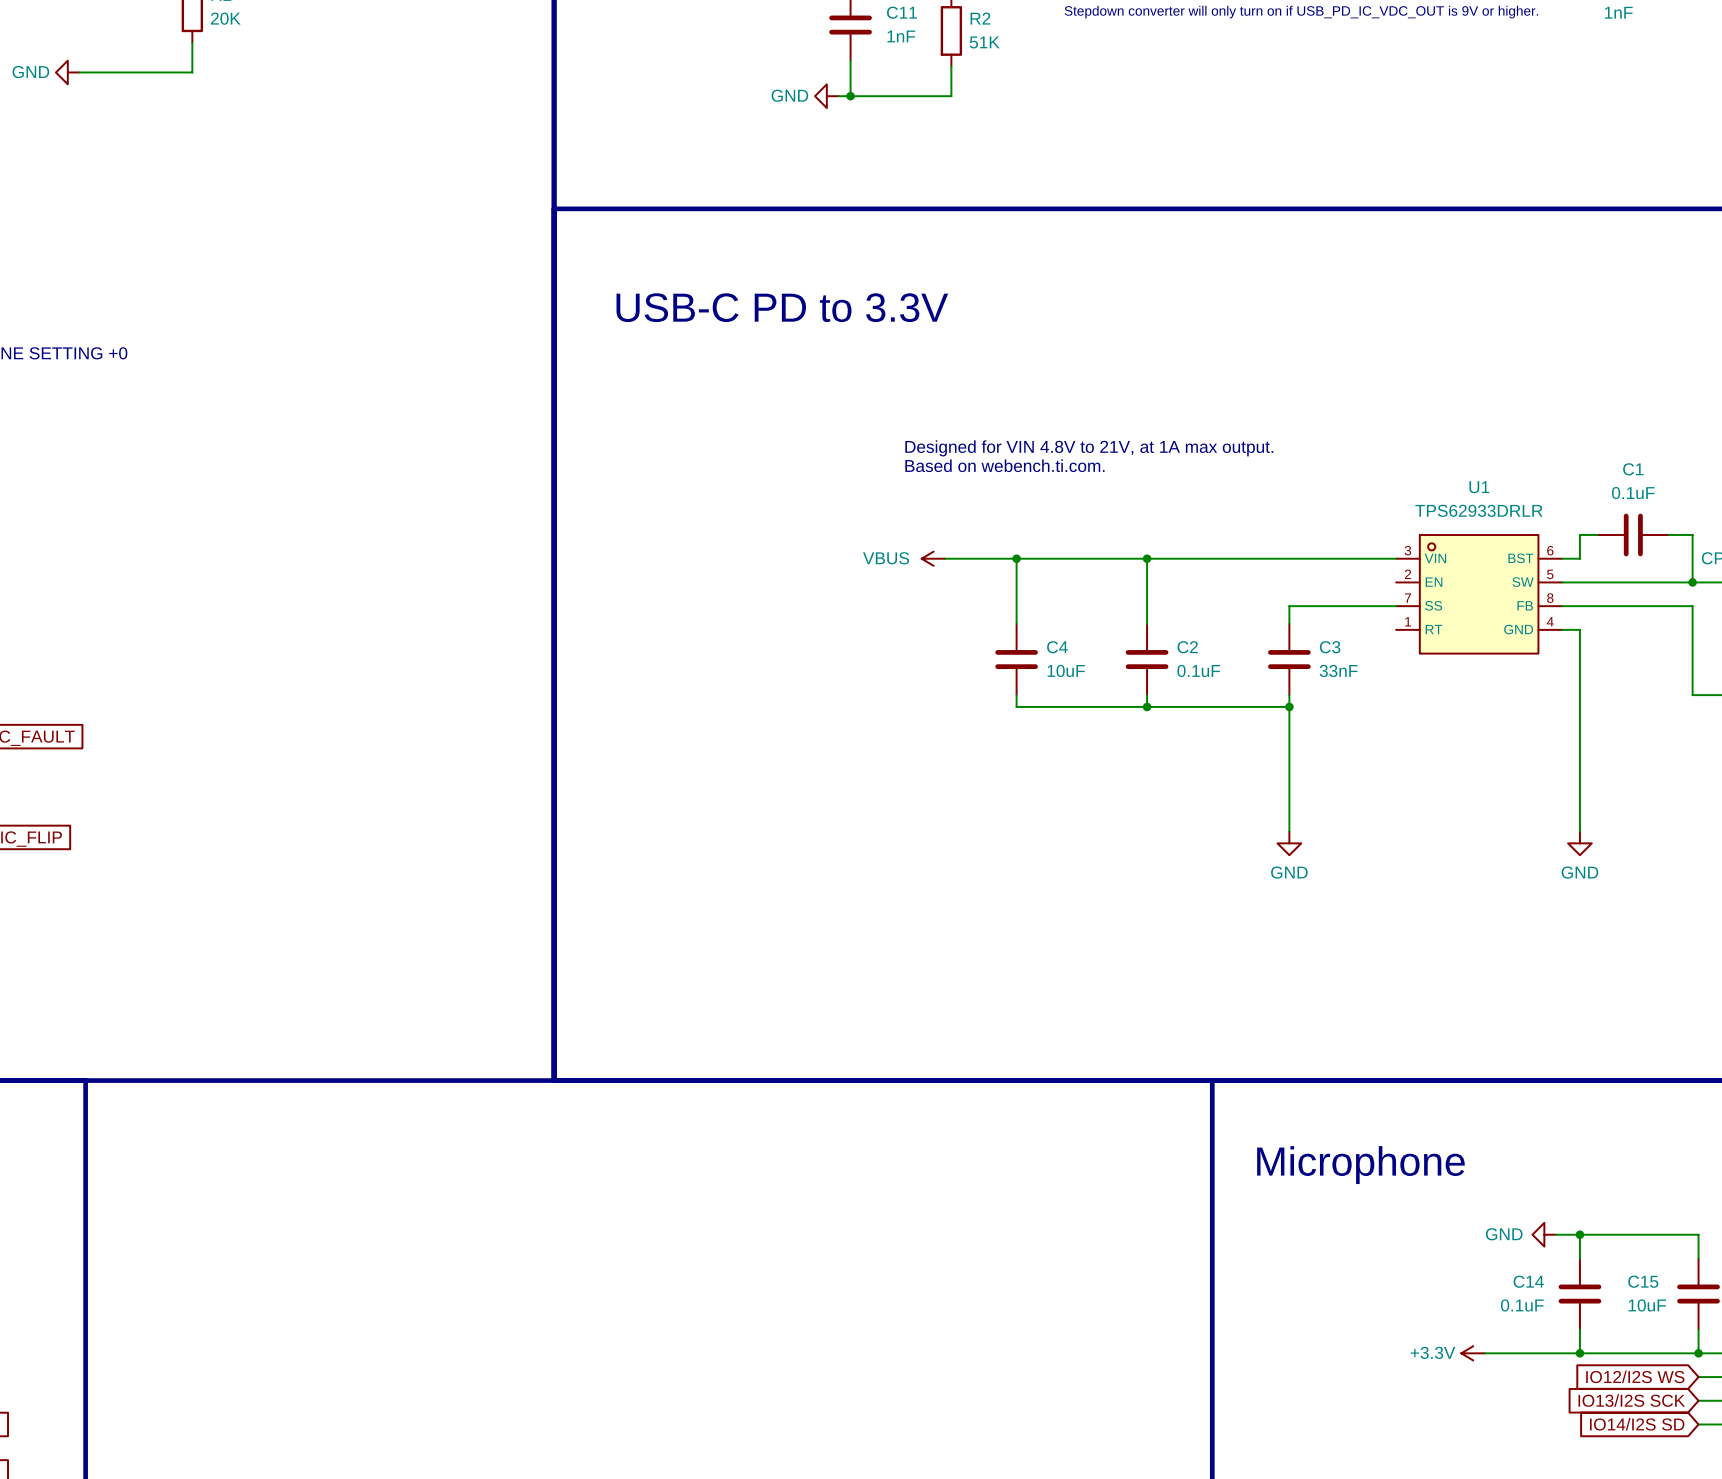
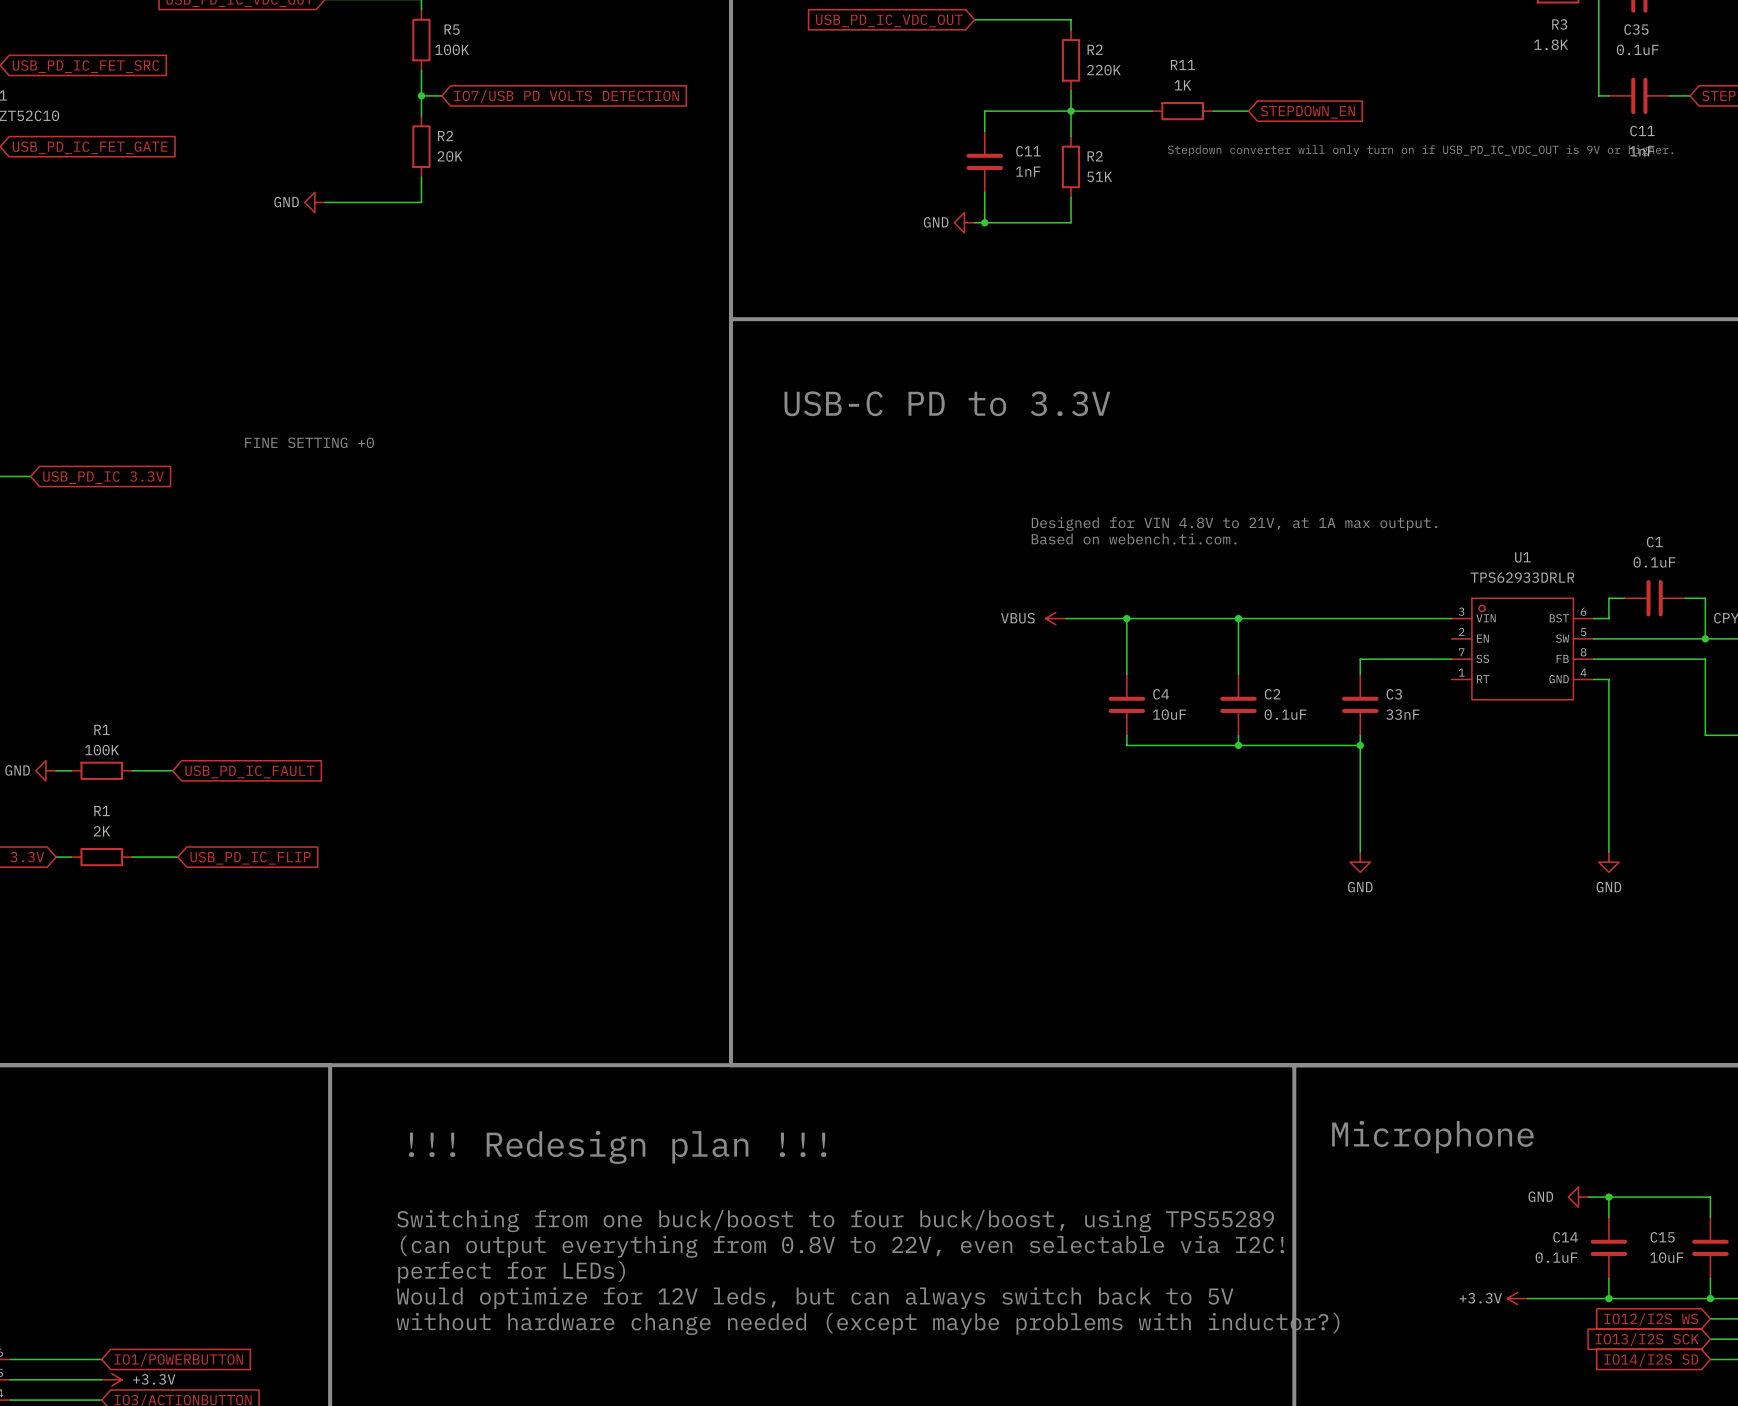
text: none -> !!! Redesign plan !!! (617, 1147)
text: none -> Switching from one buck/boost to four buck/boost, using TPS55289 (835, 1220)
text: none -> (can output everything from 0.8V to 22V, even selectable via I2C! (842, 1246)
text: none -> perfect for LEDs) (511, 1272)
text: none -> Would optimize for 12V leds, but can always switch back to 5V (815, 1298)
text: none -> without hardware change needed (except maybe problems with inductor?) (868, 1323)

